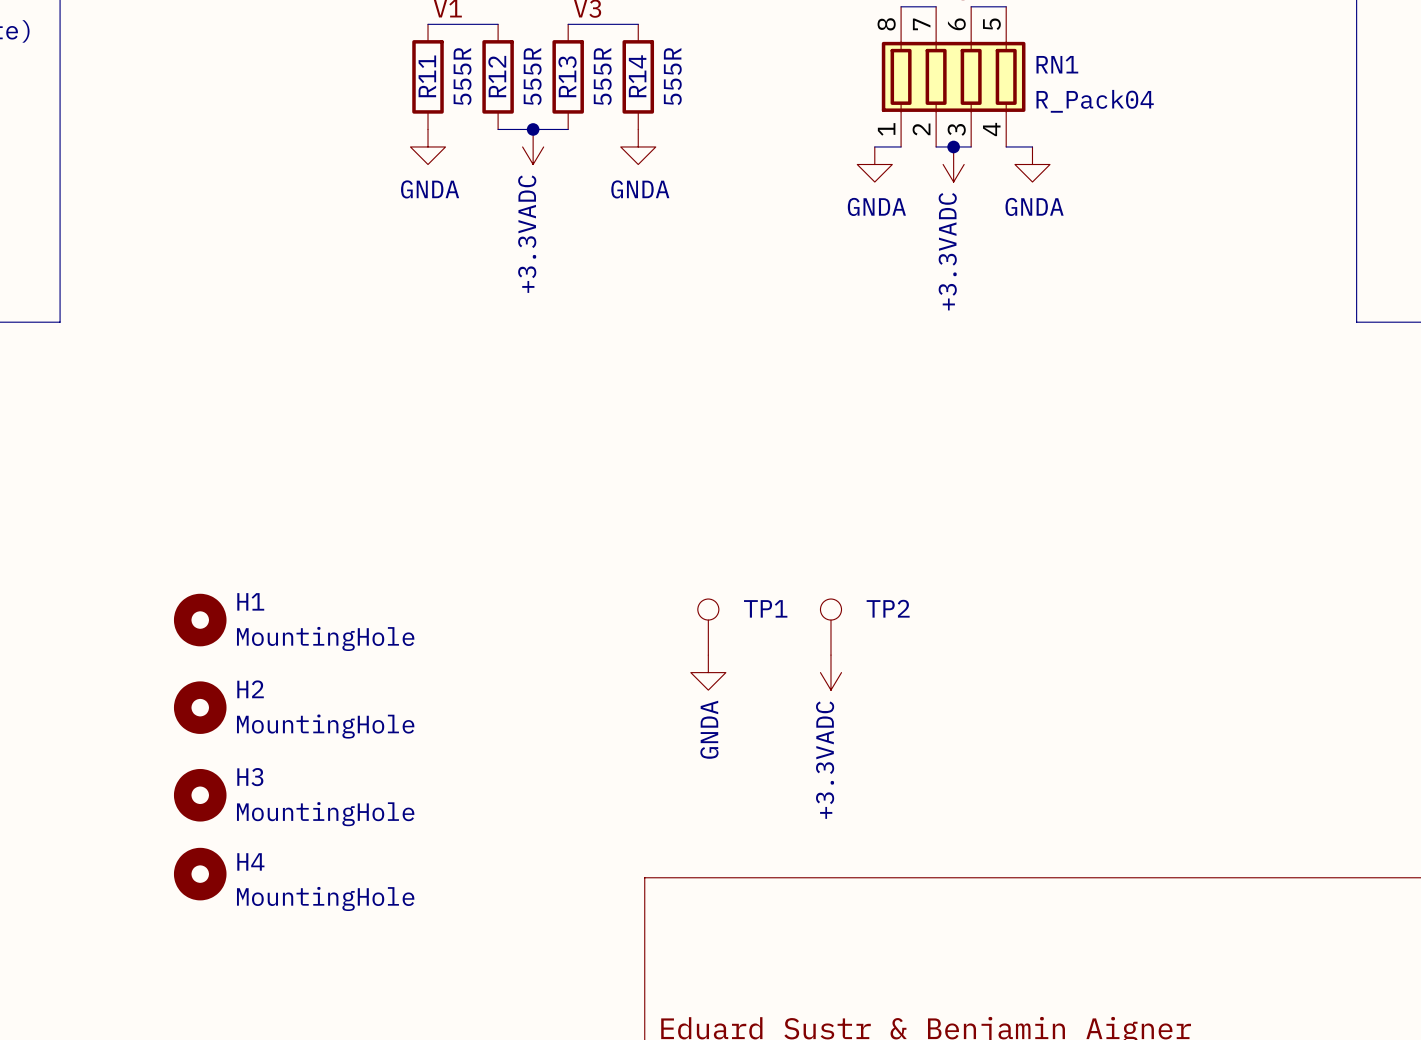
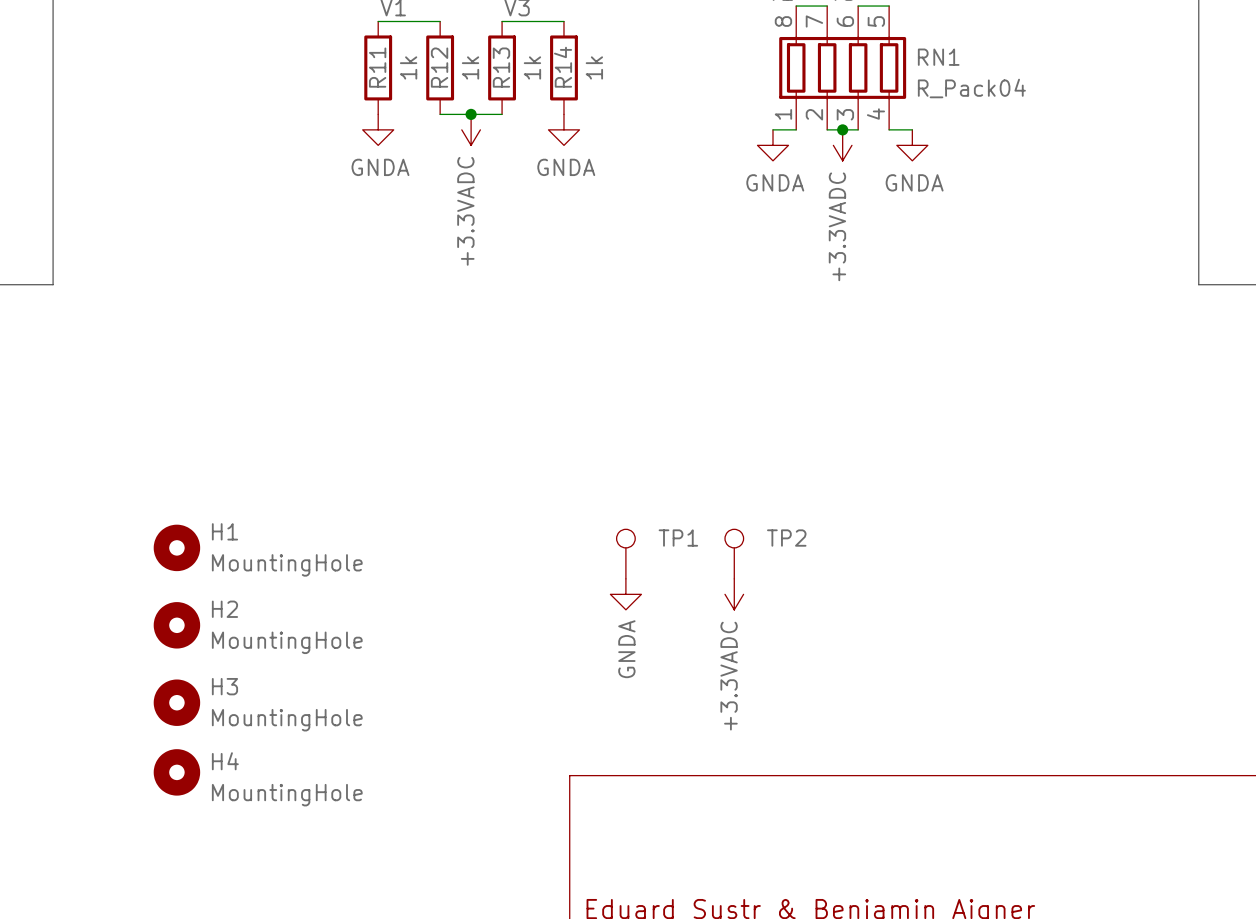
R11 value: 555R (462, 76) -> 1k (408, 67)
R12 value: 555R (532, 76) -> 1k (470, 67)
R13 value: 555R (602, 76) -> 1k (532, 67)
R14 value: 555R (672, 76) -> 1k (594, 67)

